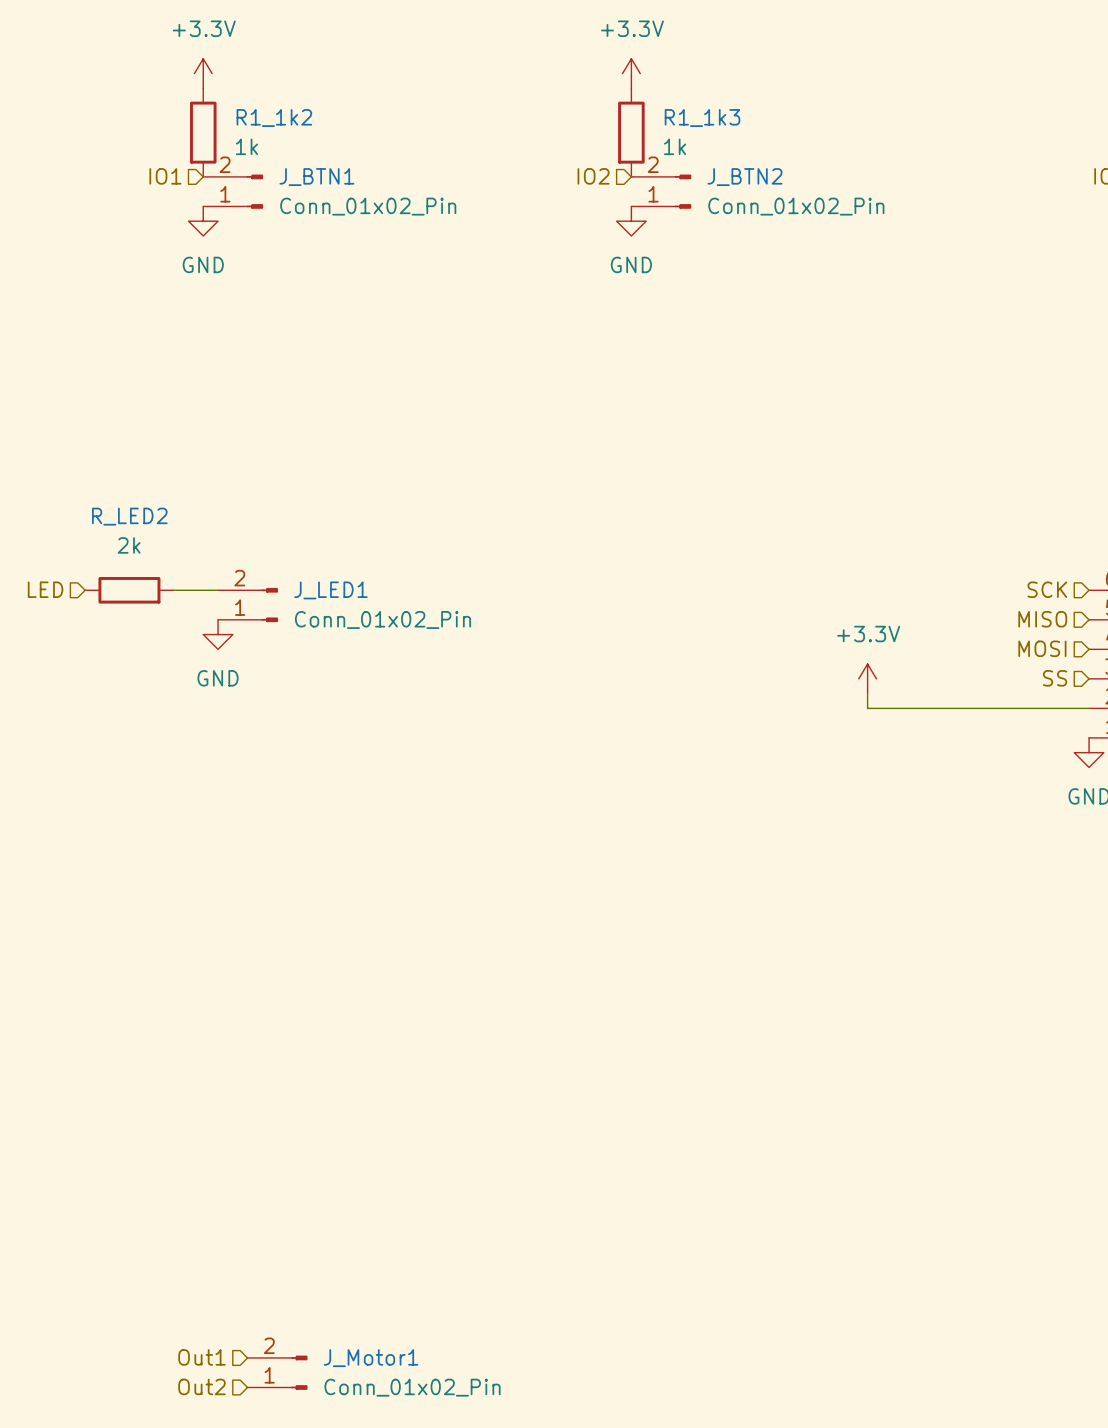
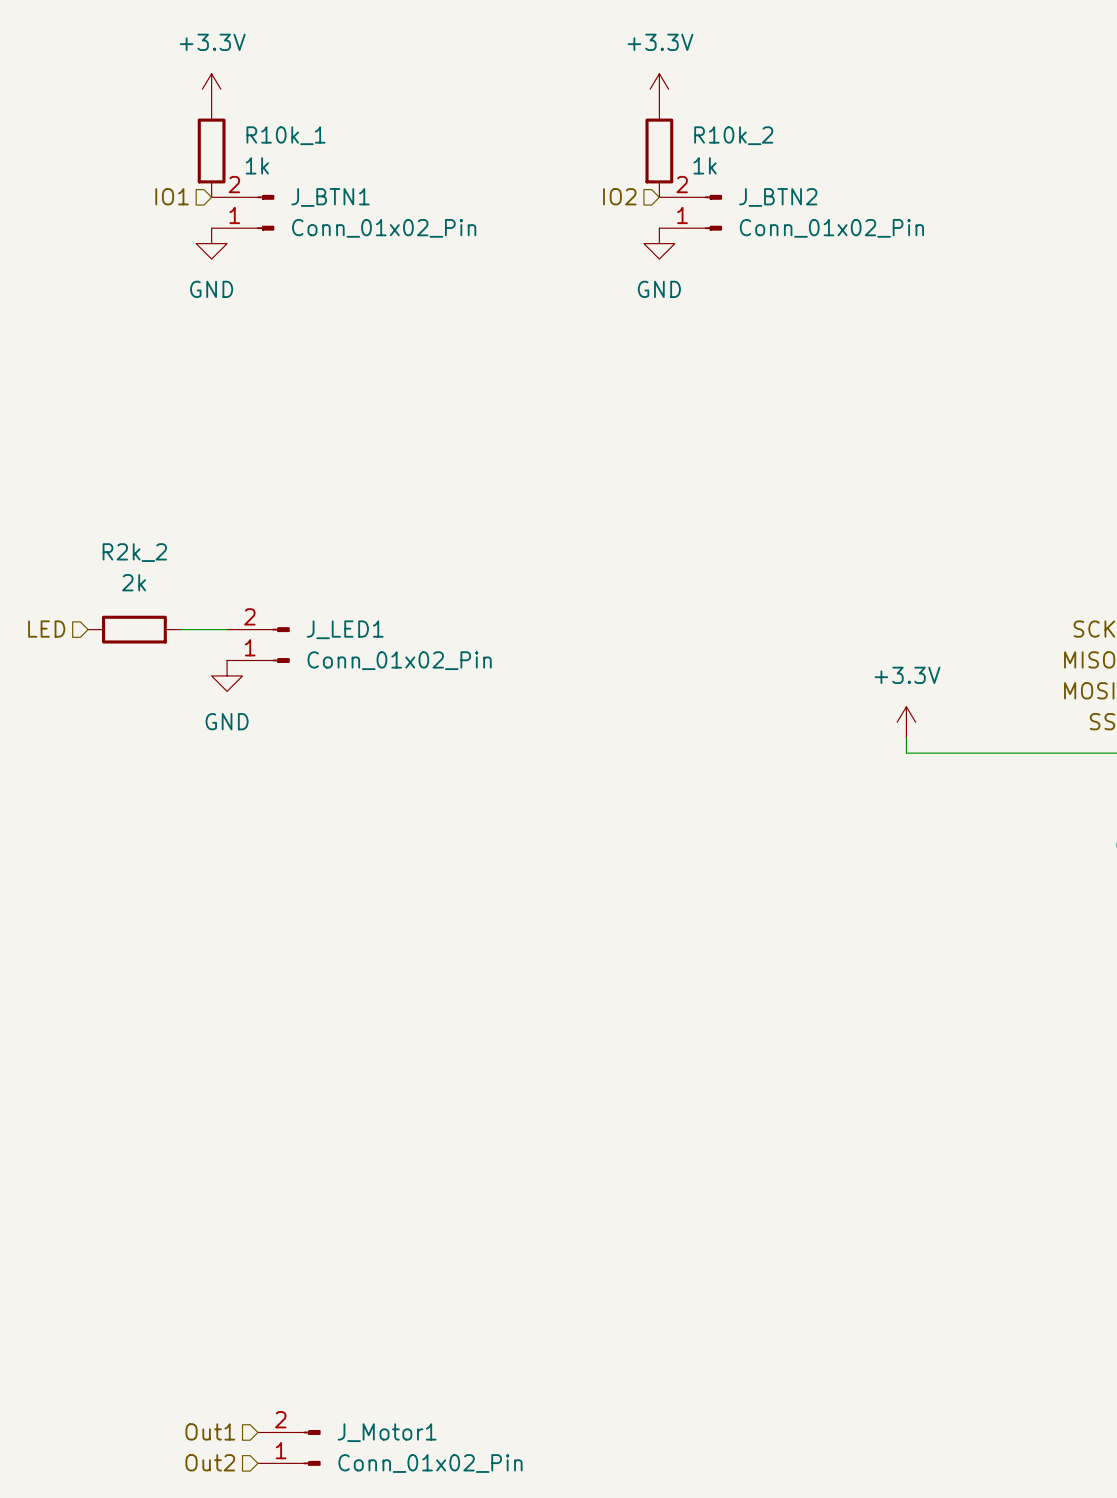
R1_1k2 name: R1_1k2 (274, 118) -> R10k_1 (286, 135)
R1_1k3 name: R1_1k3 (702, 118) -> R10k_2 (733, 135)
R_LED2 name: R_LED2 (129, 516) -> R2k_2 (134, 552)

